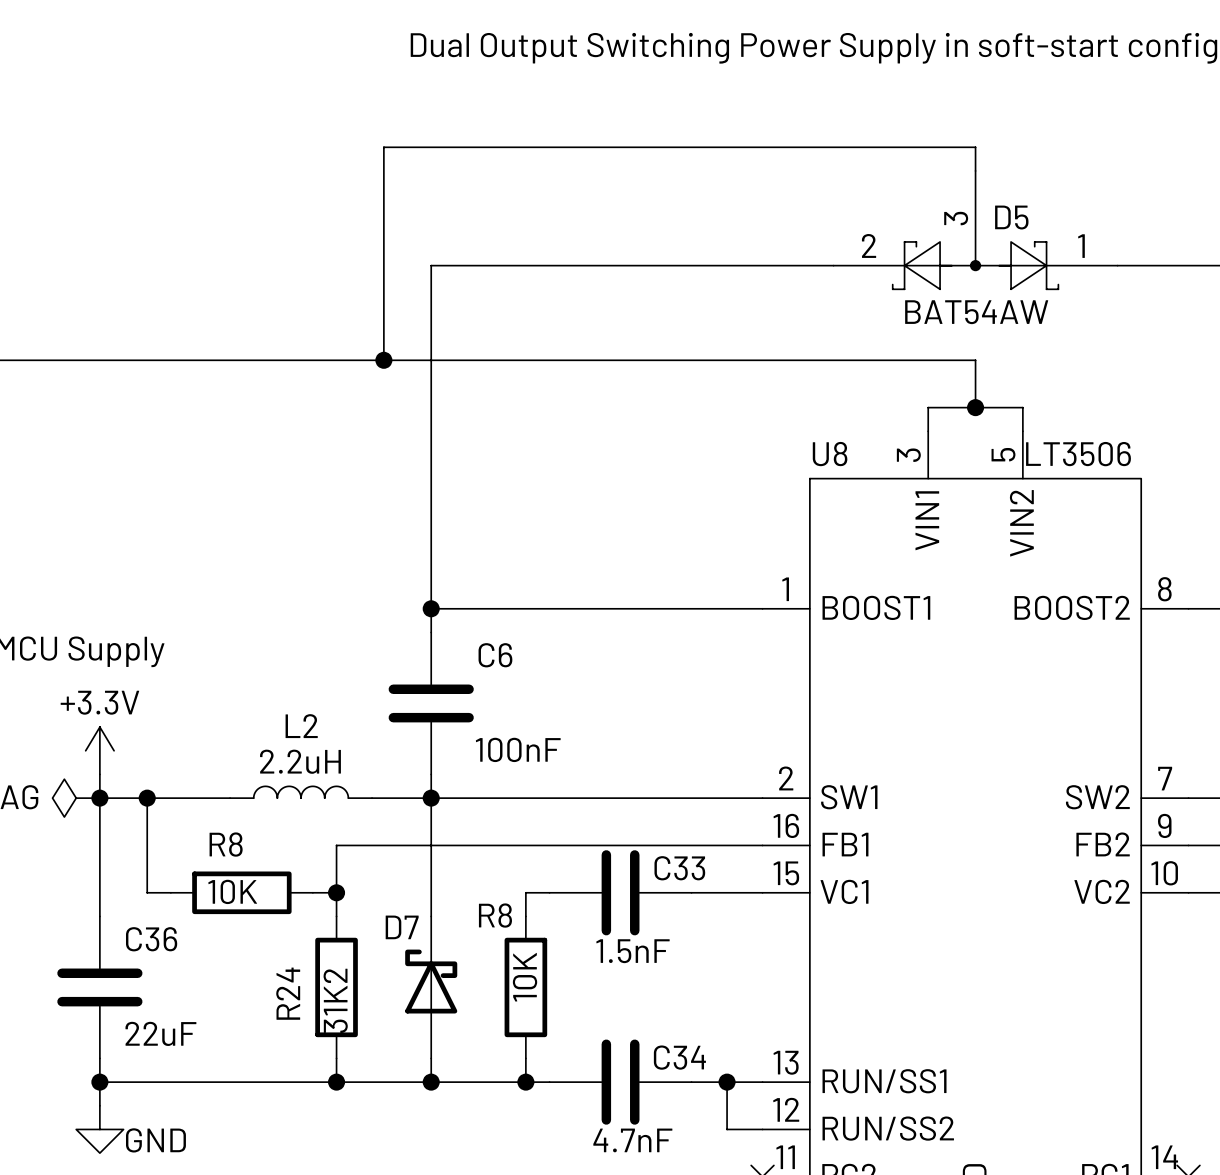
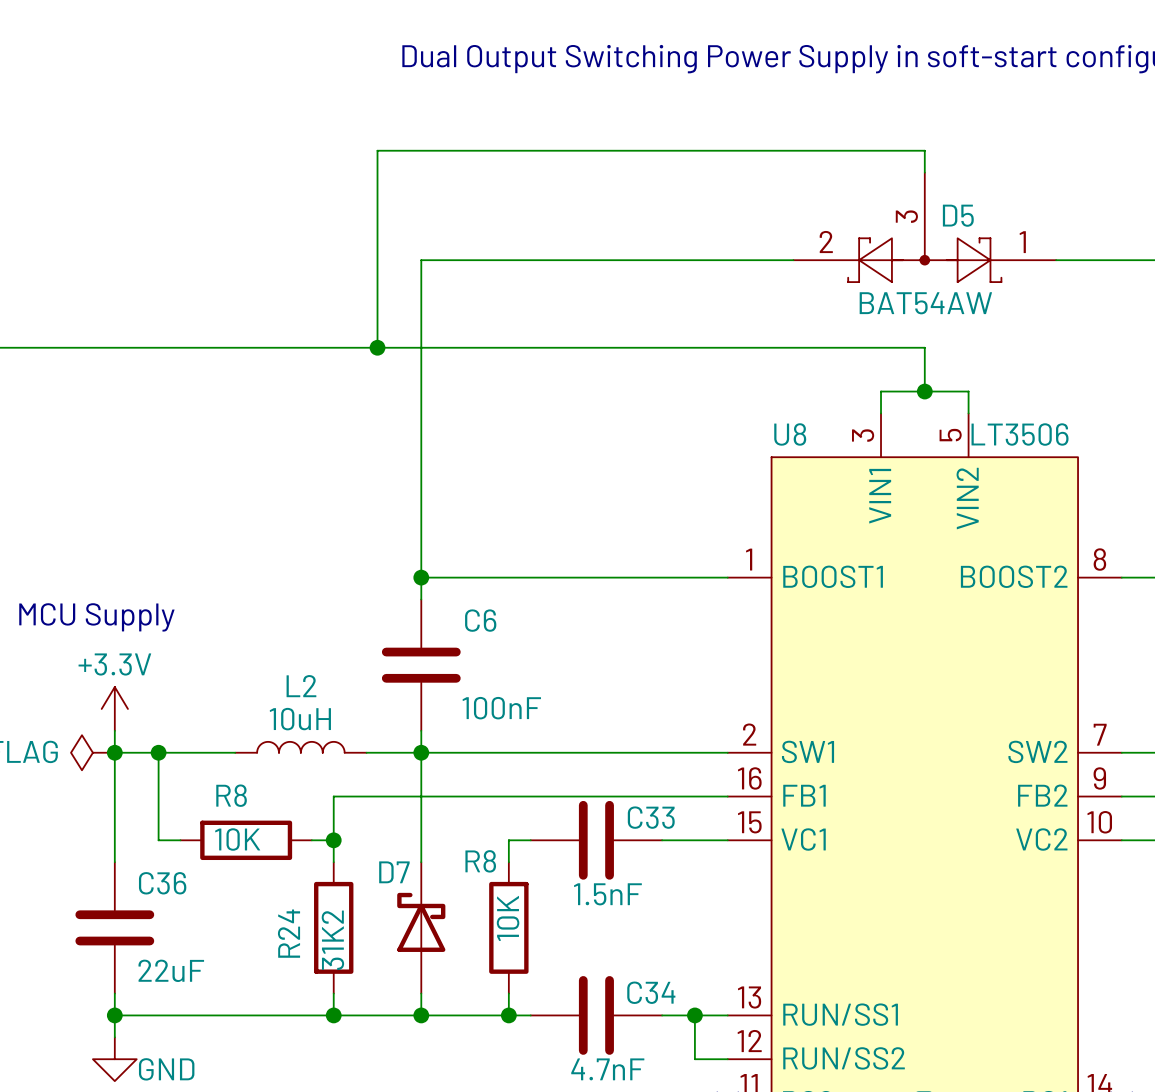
L2 value: 2.2uH (300, 761) -> 10uH (300, 719)

